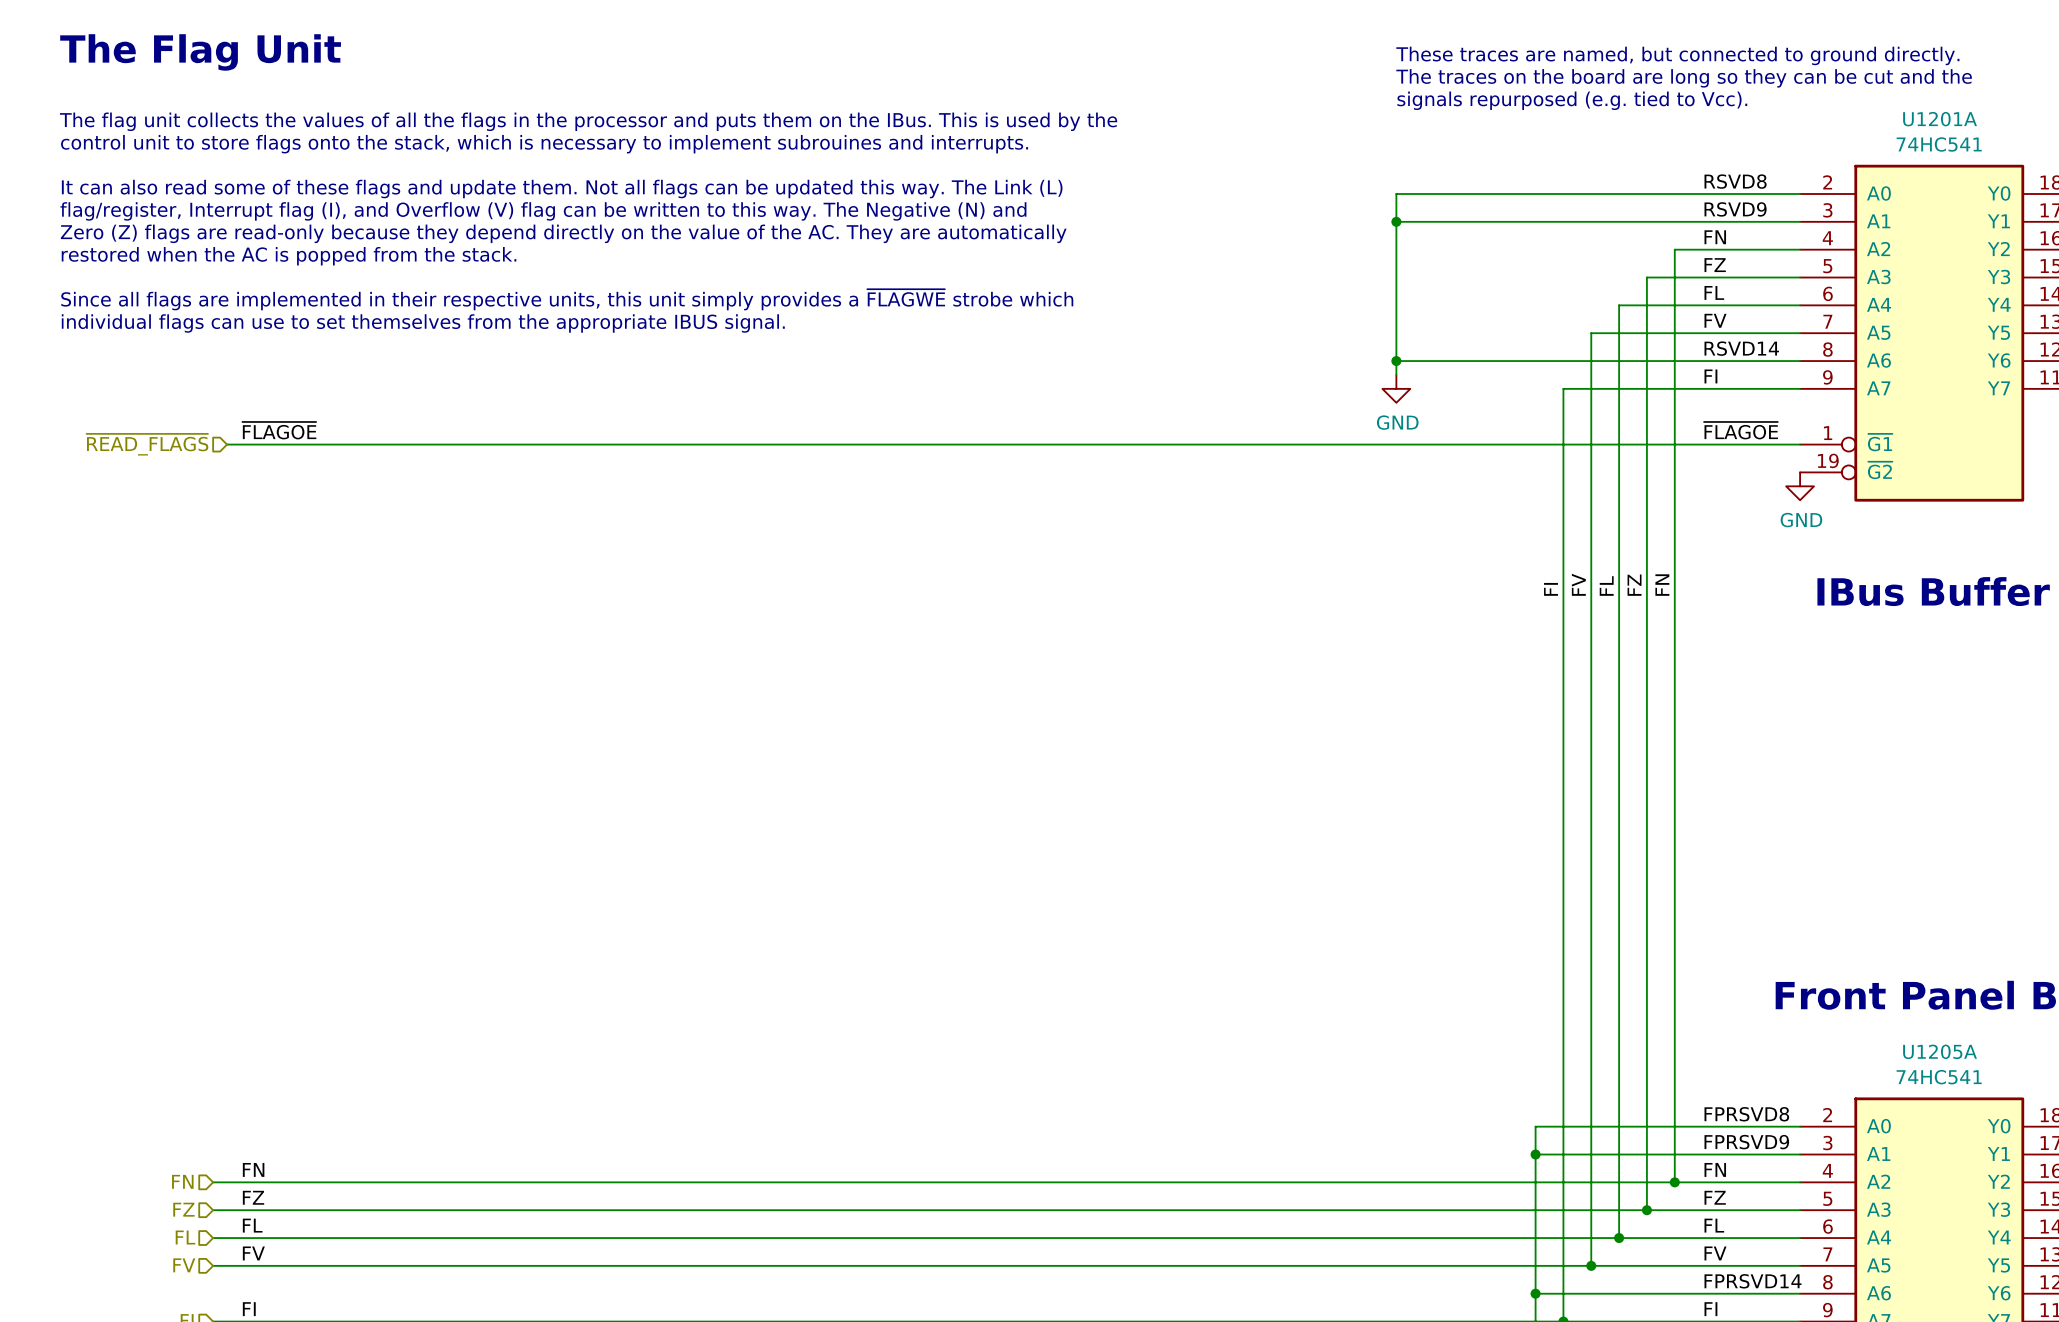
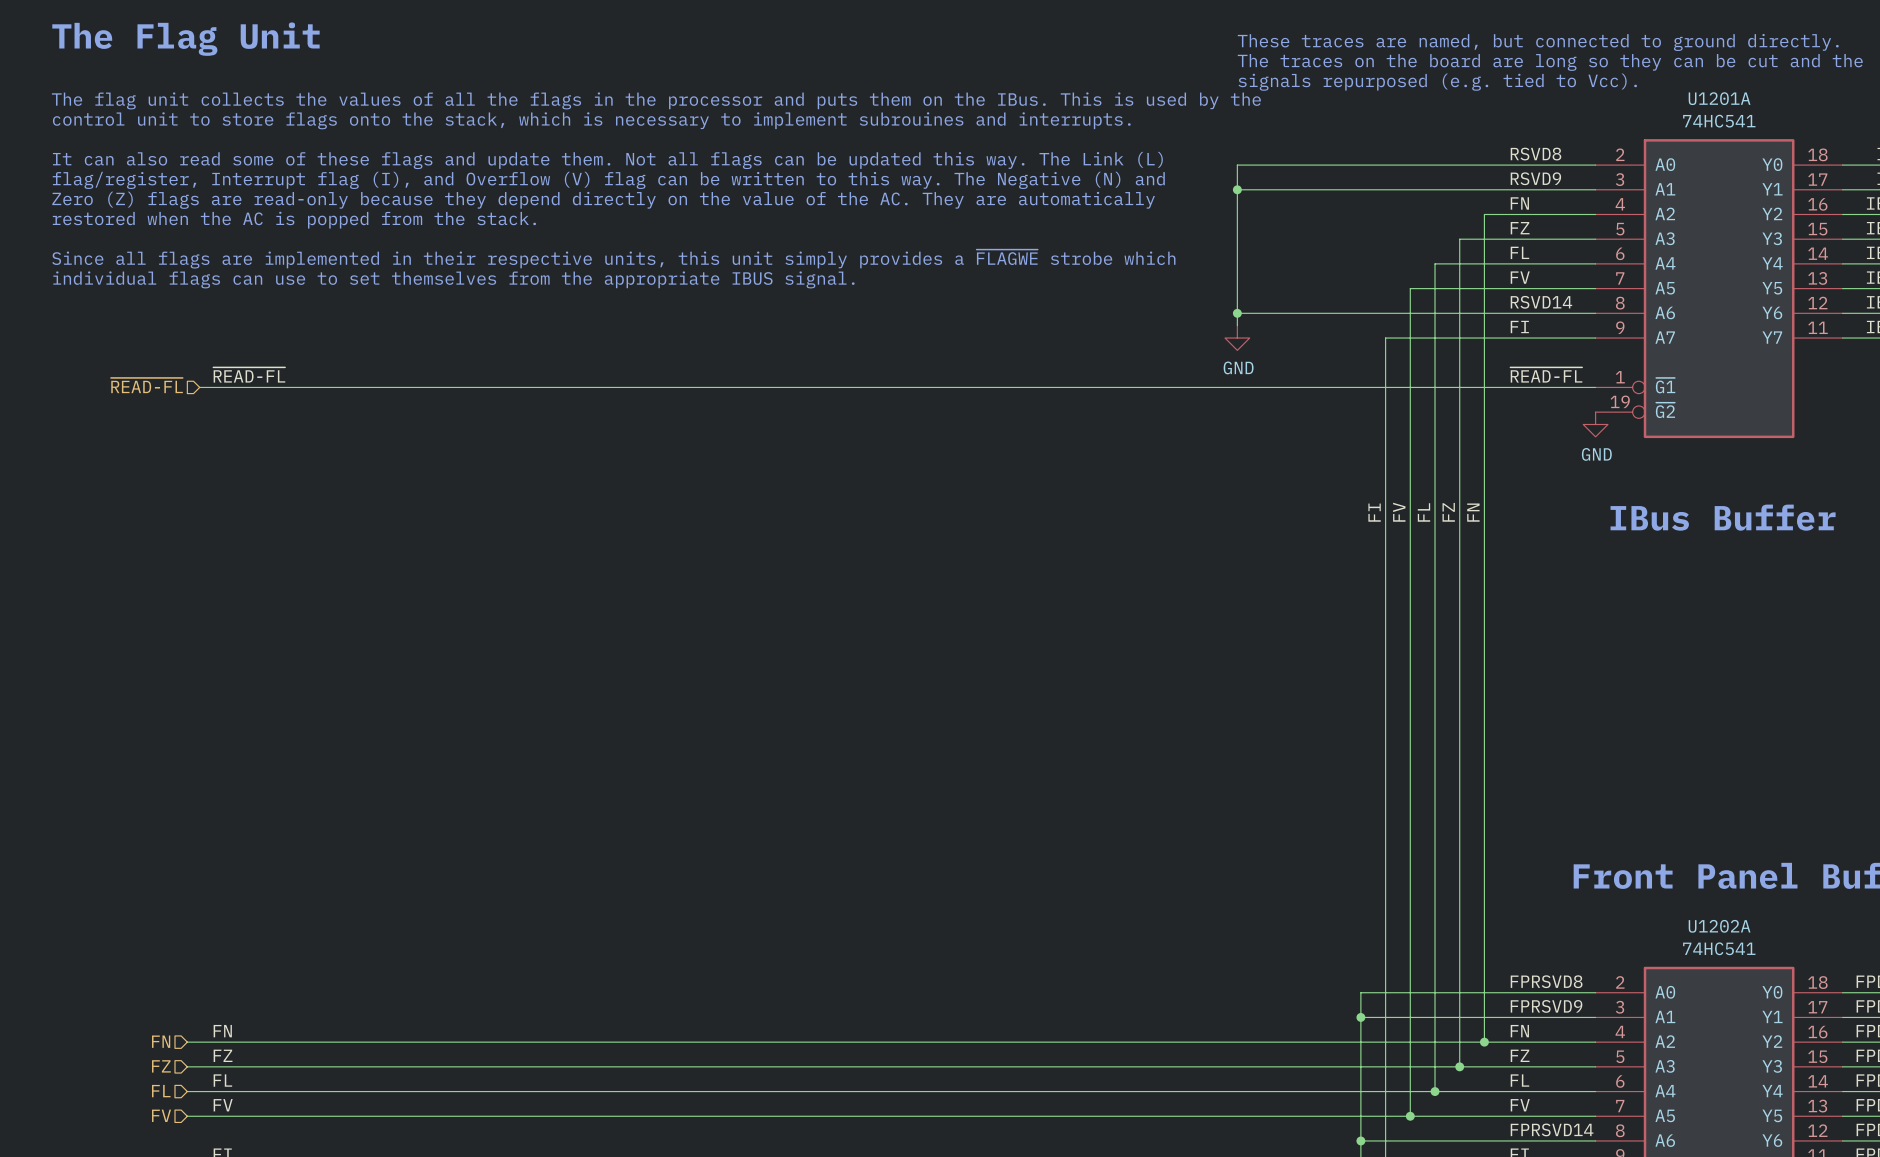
label: ~{FLAGOE} (279, 430) -> ~{READ-FL} (249, 374)
label: ~{FLAGOE} (1741, 430) -> ~{READ-FL} (1546, 374)
hierarchical label: ~{READ_FLAGS} (147, 444) -> ~{READ-FL} (146, 385)
U1205A name: U1205A (1940, 1051) -> U1202A (1719, 926)

